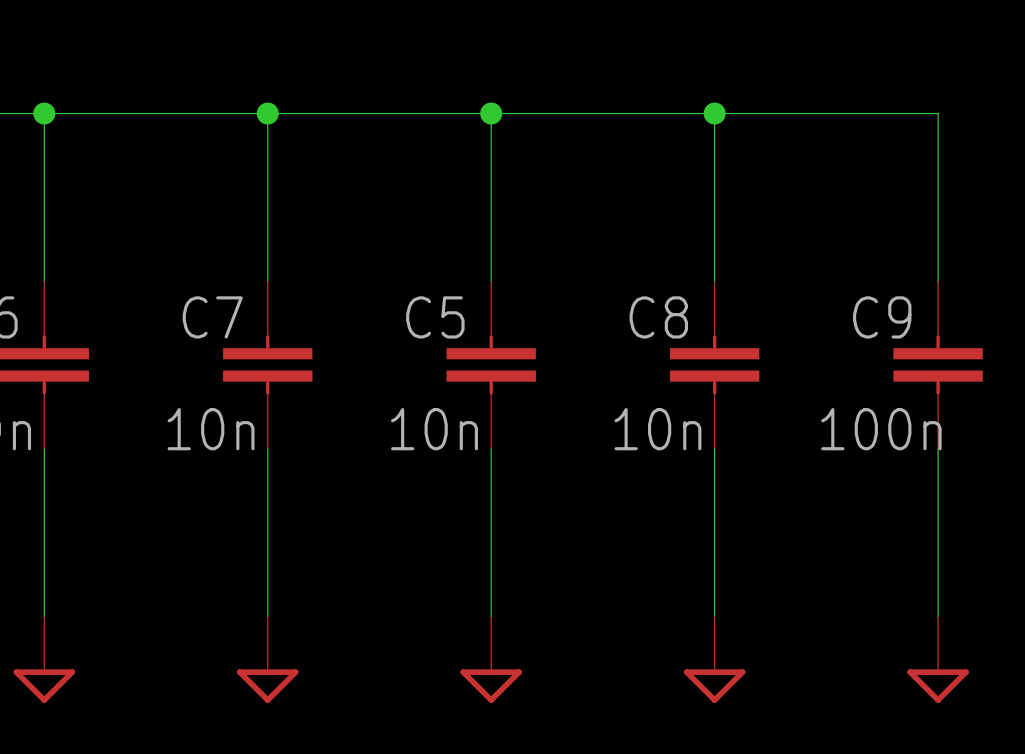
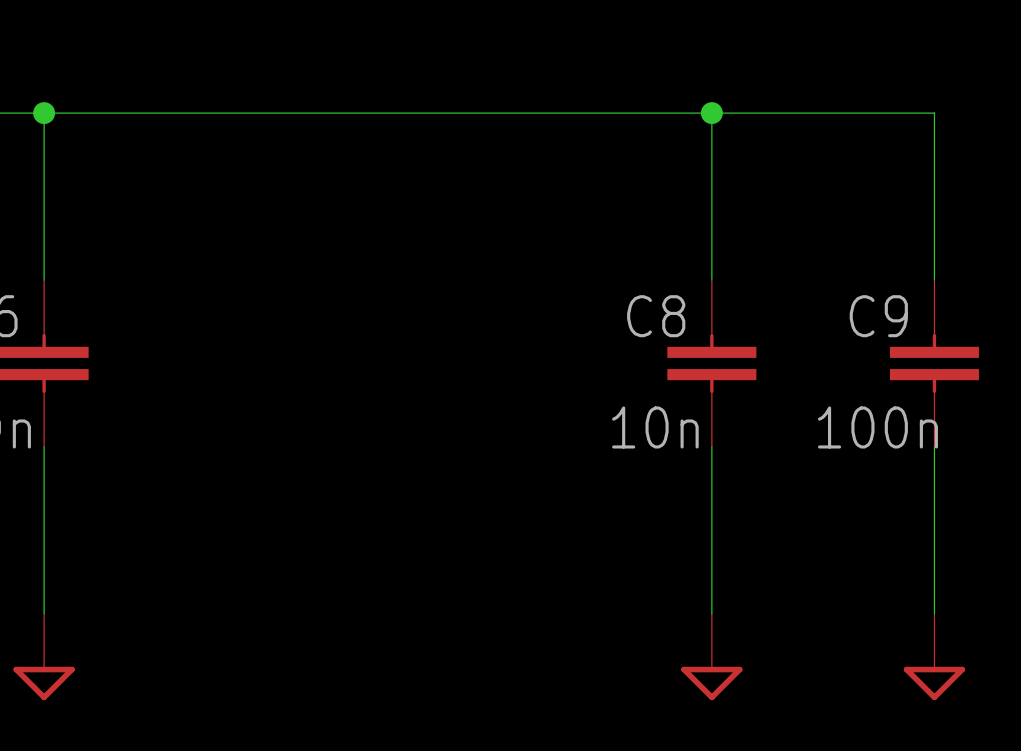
wire: (267, 113) (267, 281) -> none
junction: (267, 113) -> none
wire: (491, 113) (491, 281) -> none
junction: (491, 113) -> none
C7: 10n (267, 364) -> none
C5: 10n (491, 364) -> none
wire: (267, 448) (267, 616) -> none
wire: (491, 448) (491, 616) -> none
power symbol: (267, 659) -> none
power symbol: (491, 659) -> none

